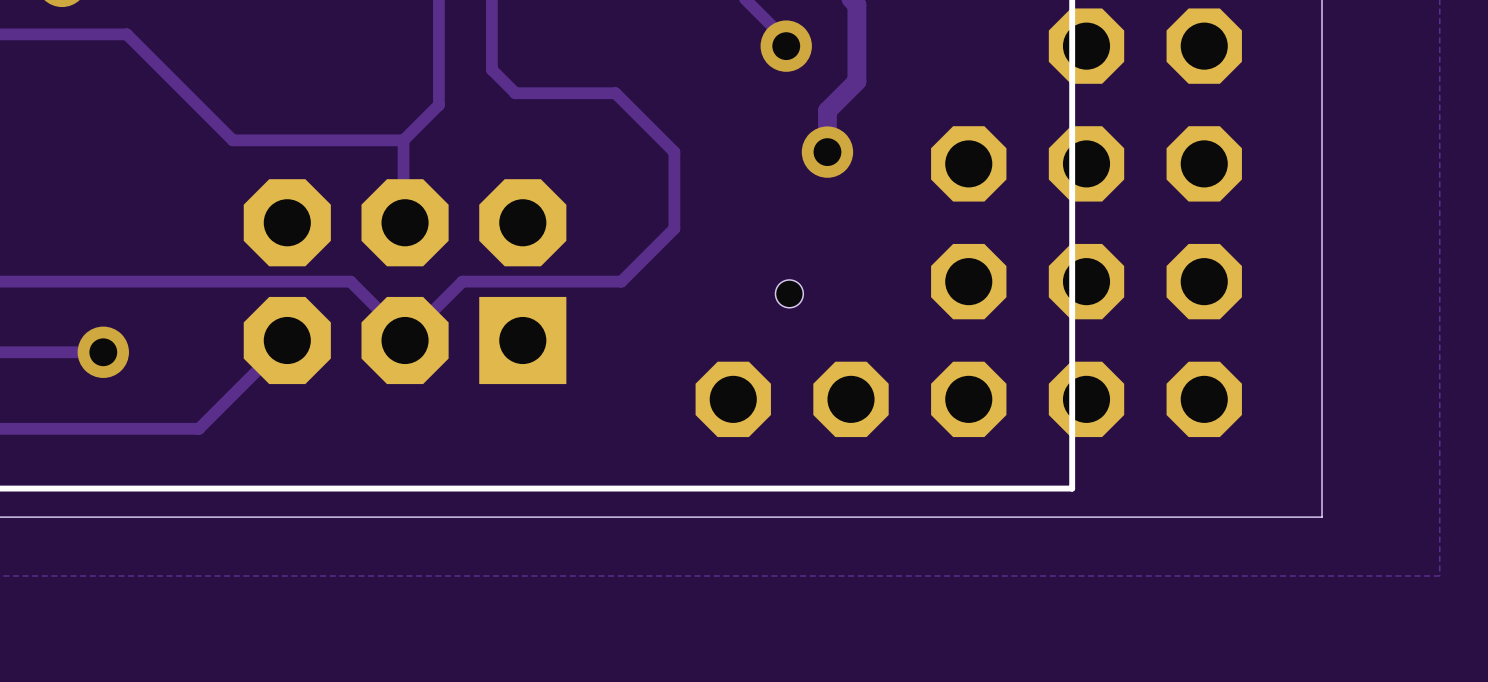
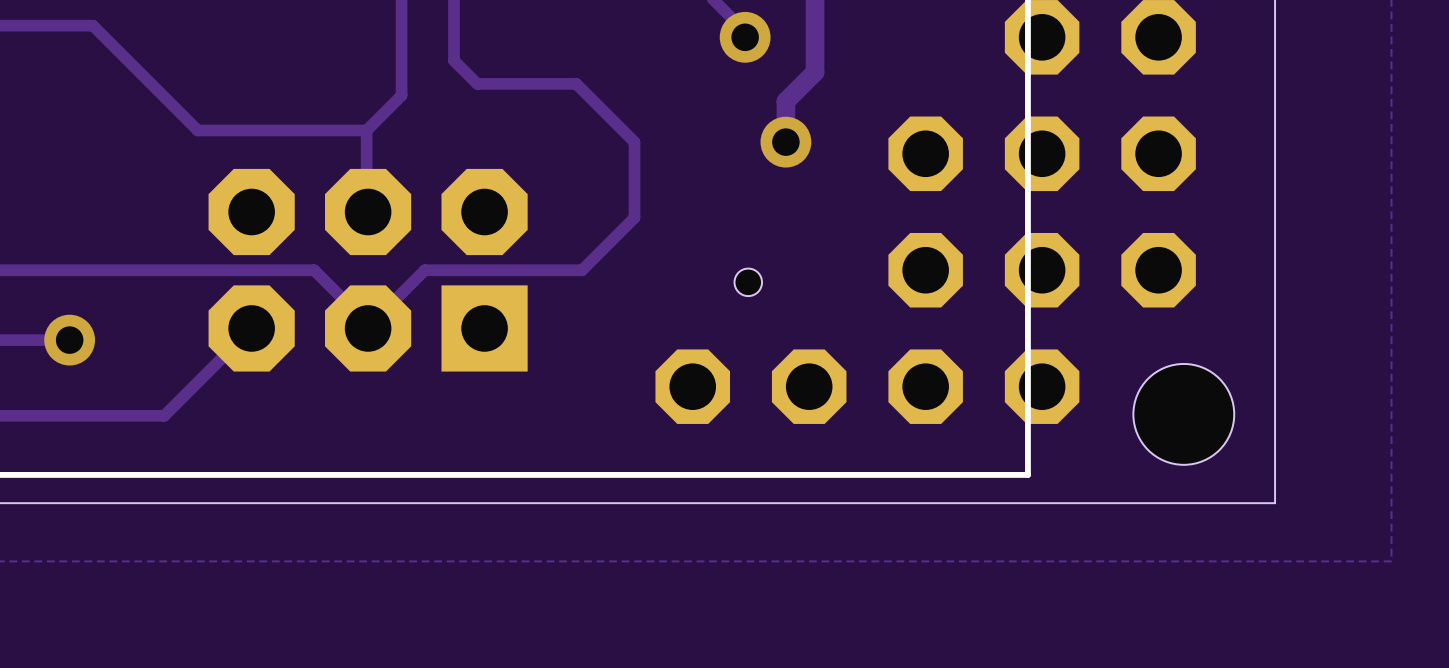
part: (1204, 399) -> none
hole: none -> (1183, 414)

